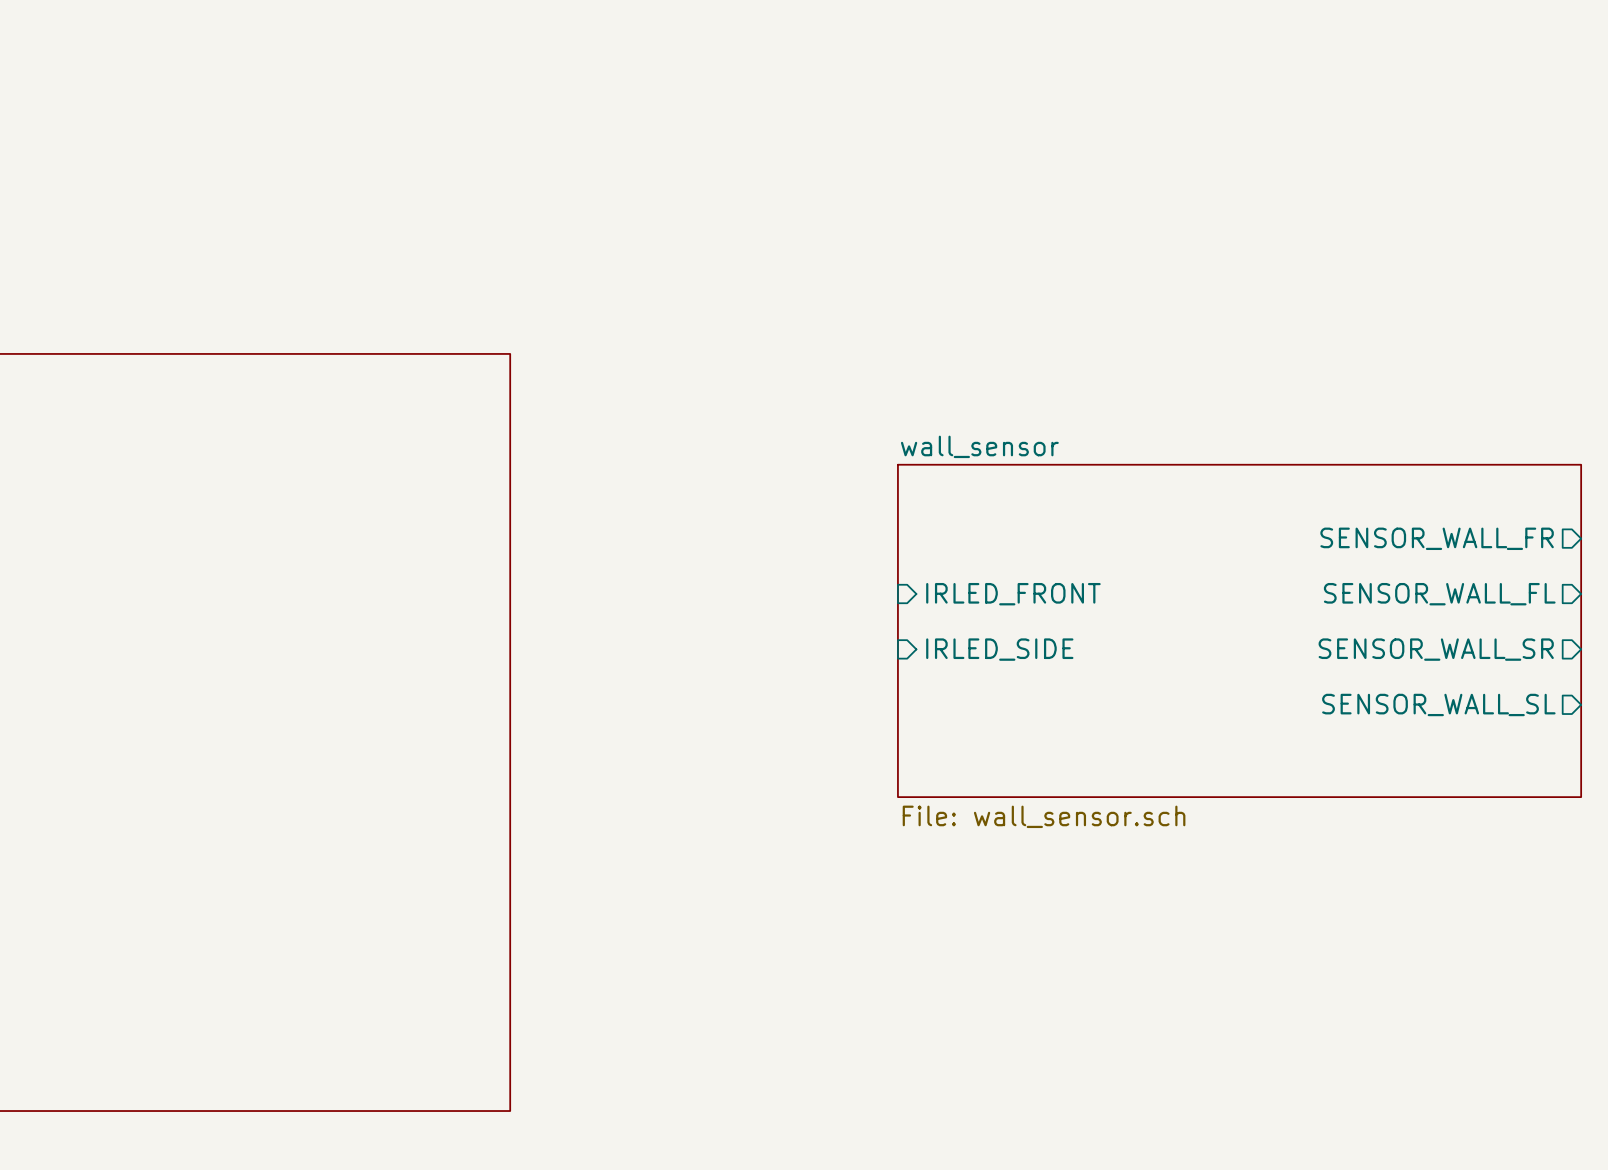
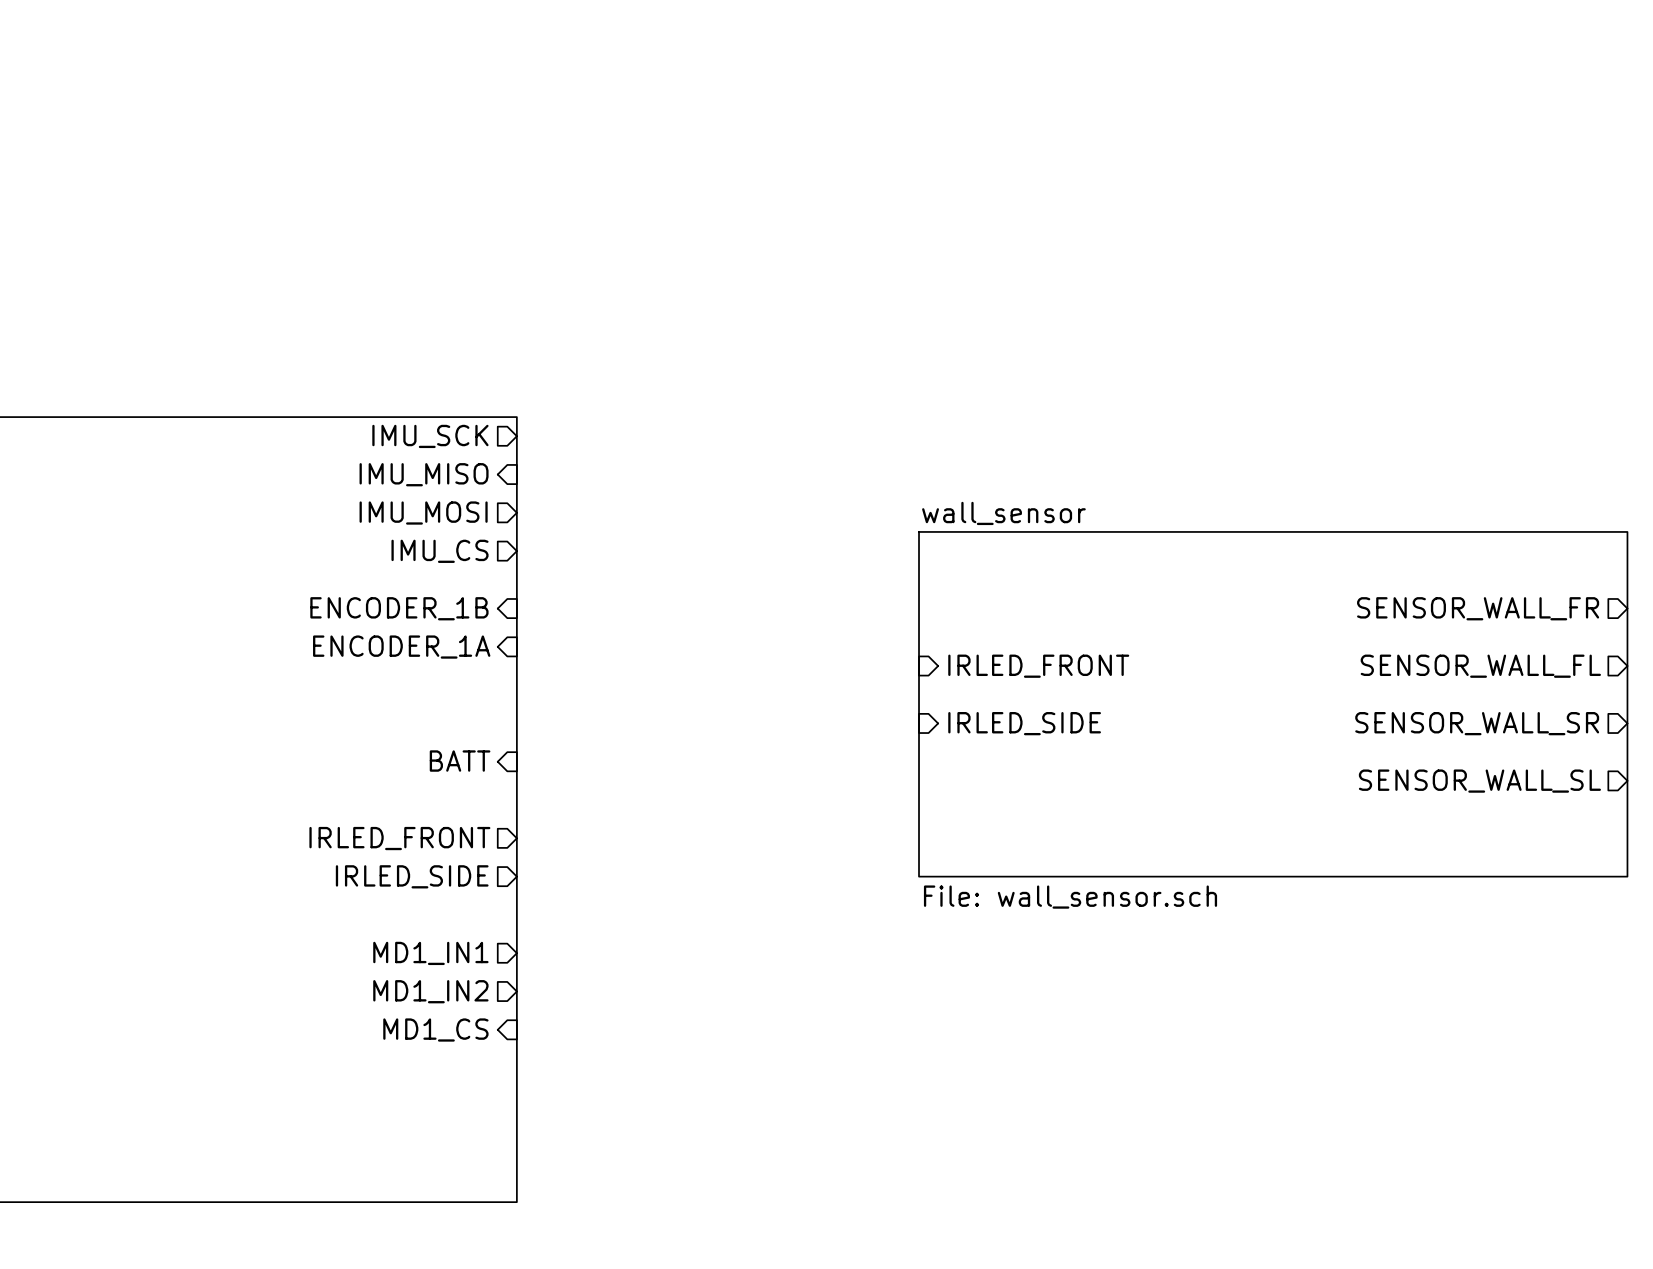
sheet pin: none -> IMU_SCK (430, 436)
sheet pin: none -> IMU_MISO (424, 474)
sheet pin: none -> IMU_MOSI (423, 513)
sheet pin: none -> IMU_CS (440, 551)
sheet pin: none -> ENCODER_1B (399, 608)
sheet pin: none -> ENCODER_1A (401, 647)
sheet pin: none -> BATT (460, 761)
sheet pin: none -> IRLED_FRONT (399, 838)
sheet pin: none -> IRLED_SIDE (412, 876)
sheet pin: none -> MD1_IN1 (430, 953)
sheet pin: none -> MD1_IN2 (430, 991)
sheet pin: none -> MD1_CS (435, 1030)

